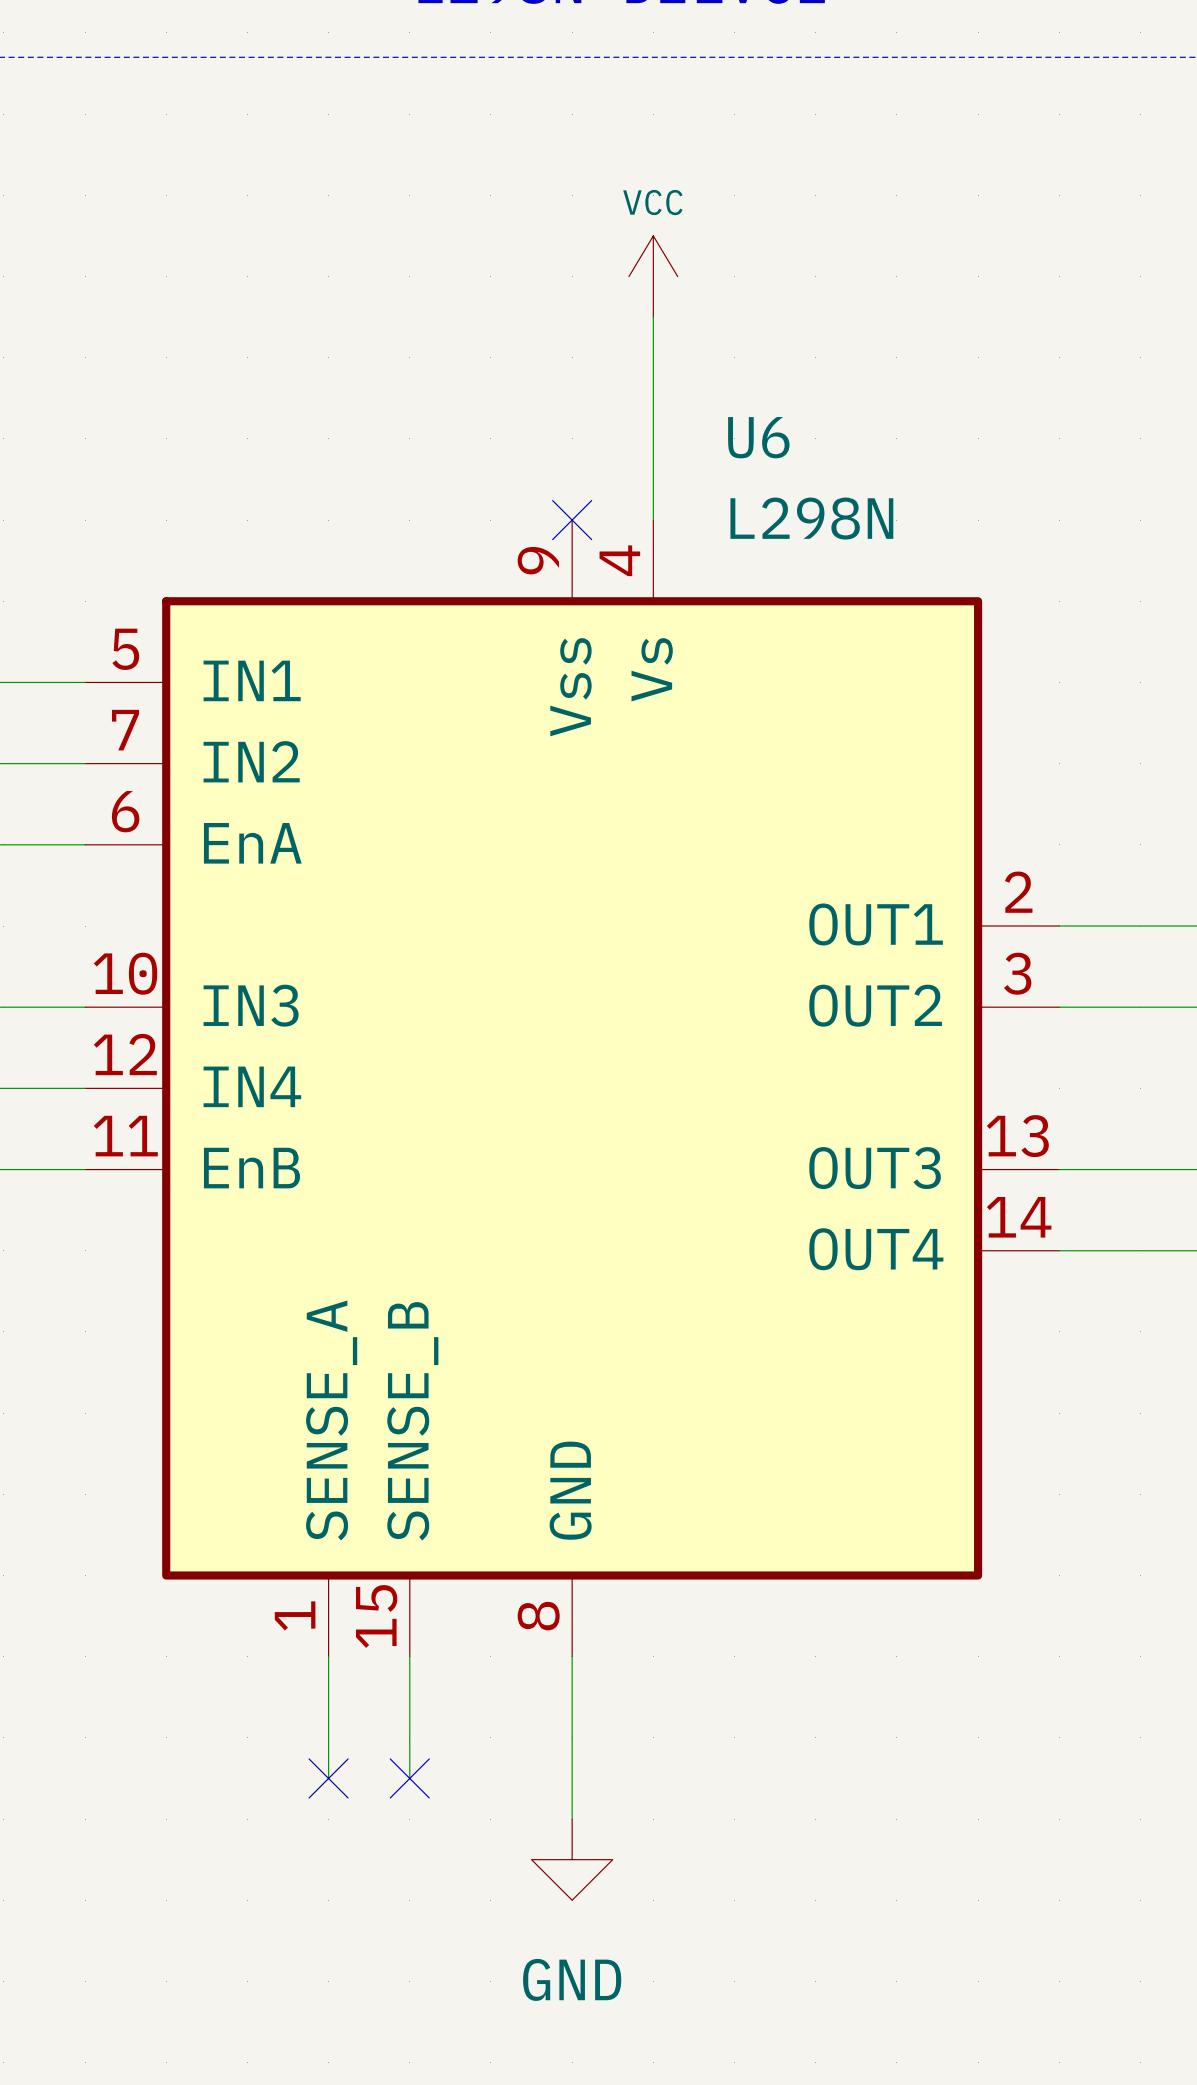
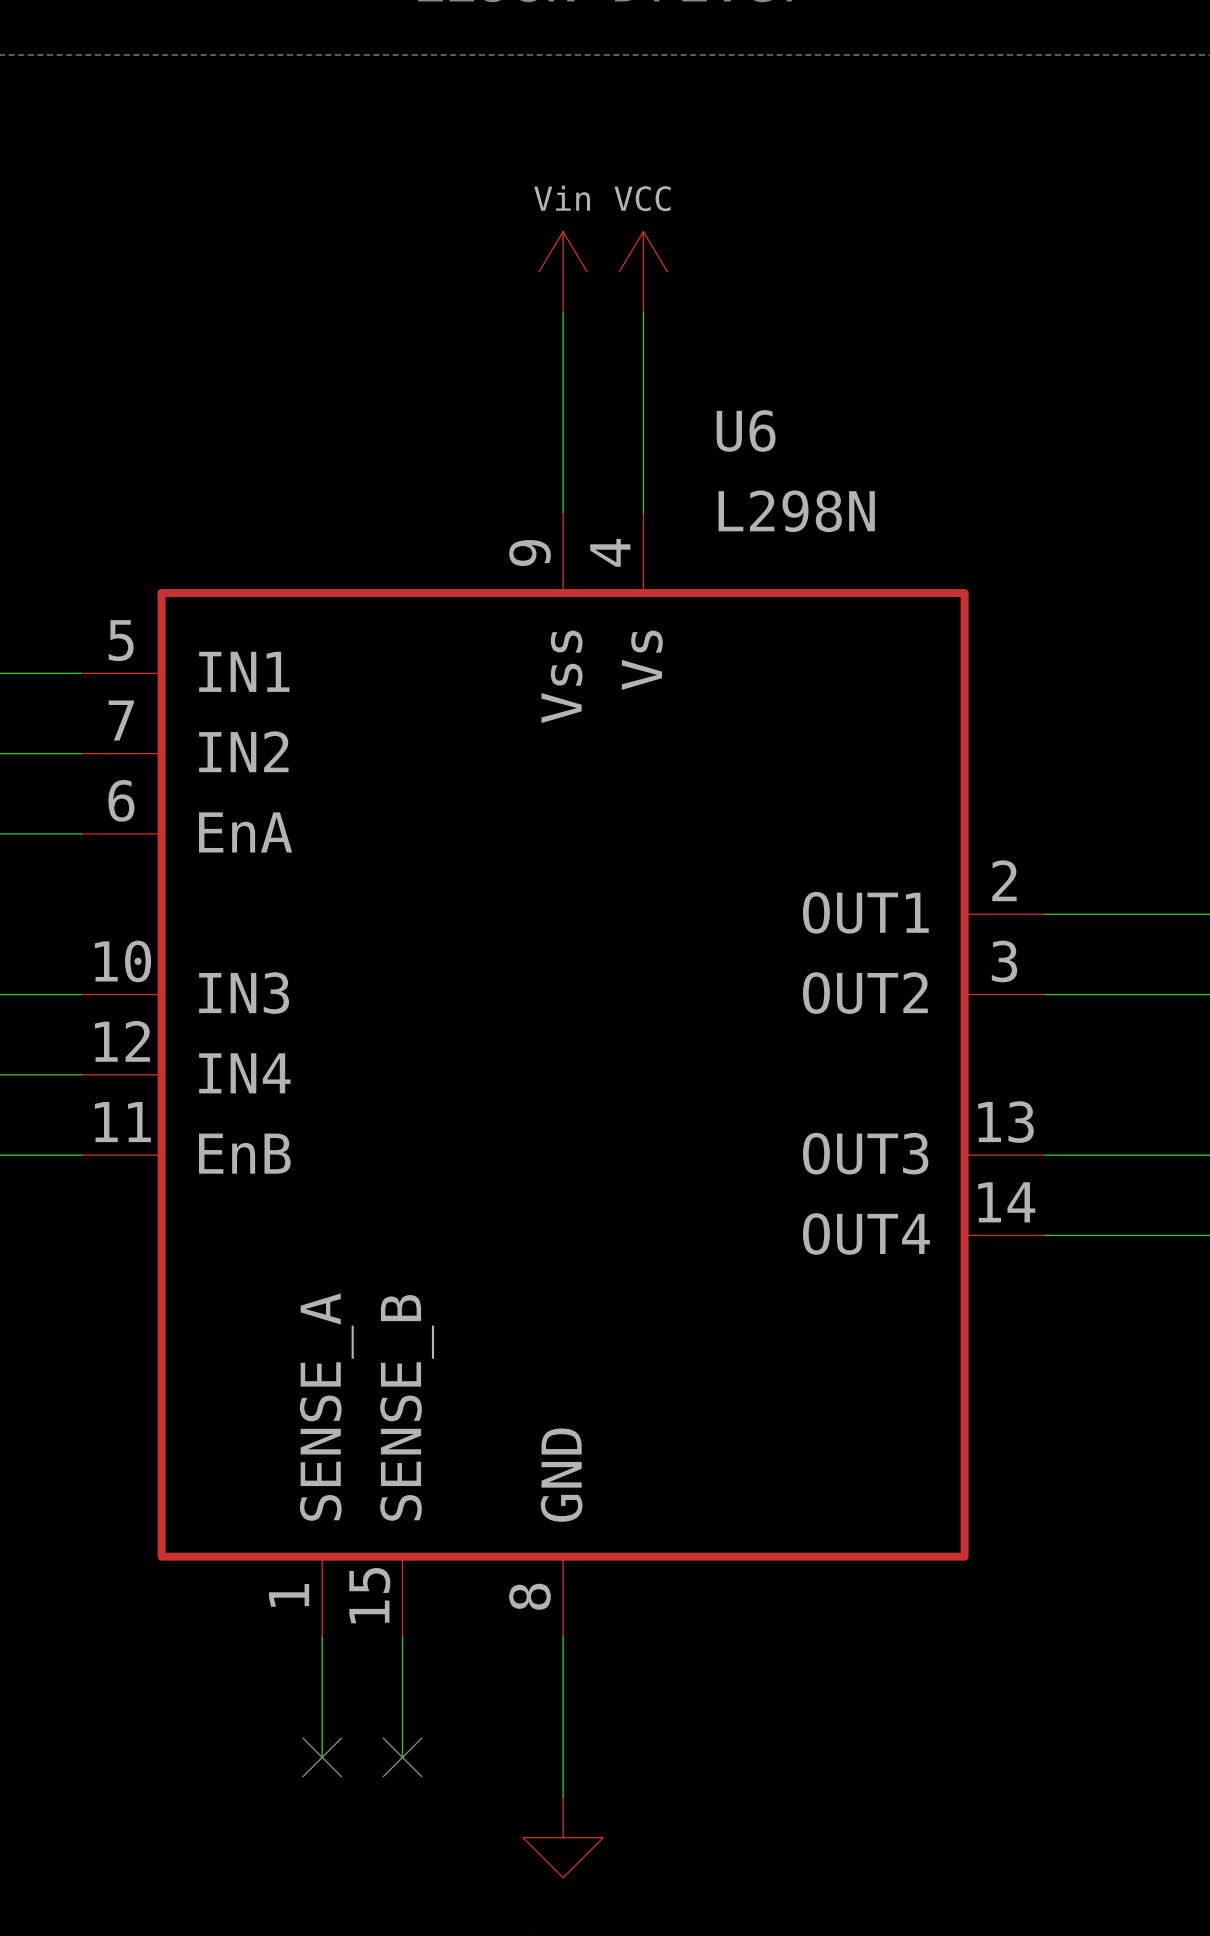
power symbol: none -> Vin (563, 271)
wire: none -> (563, 311) (563, 512)
no-connect mark: (572, 520) -> none

